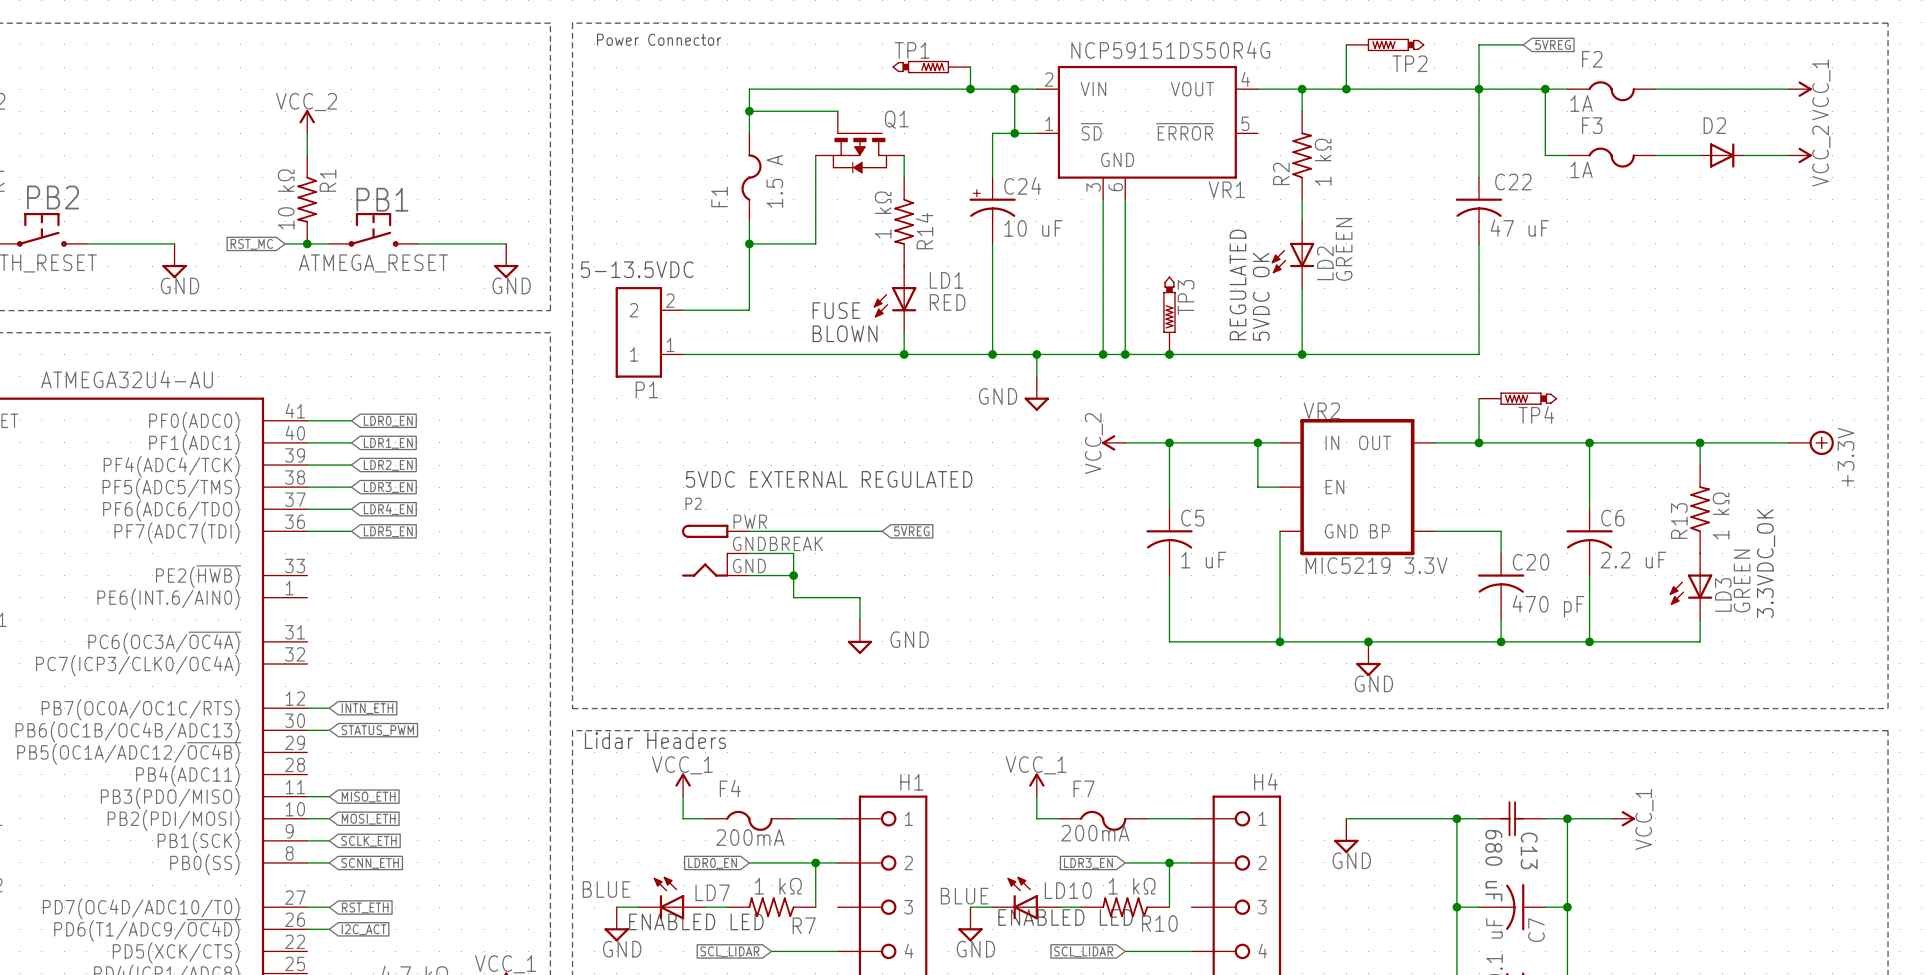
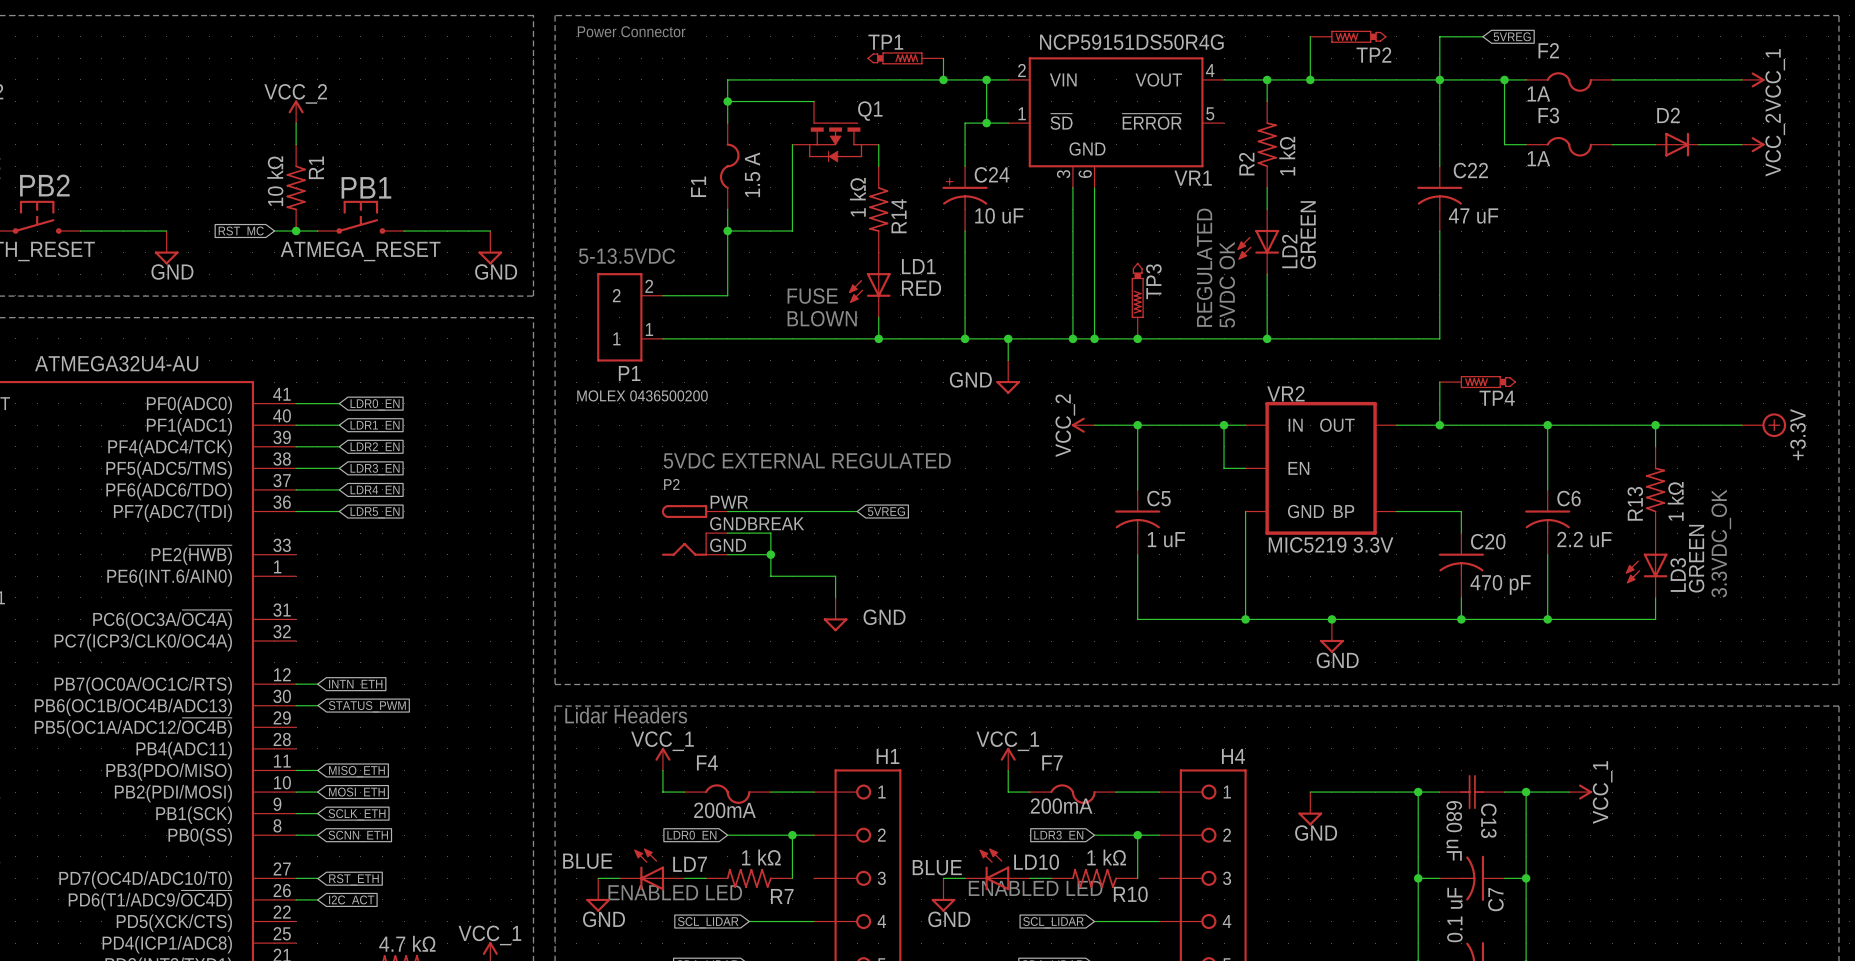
P1 value: none -> MOLEX 0436500200 (642, 395)

